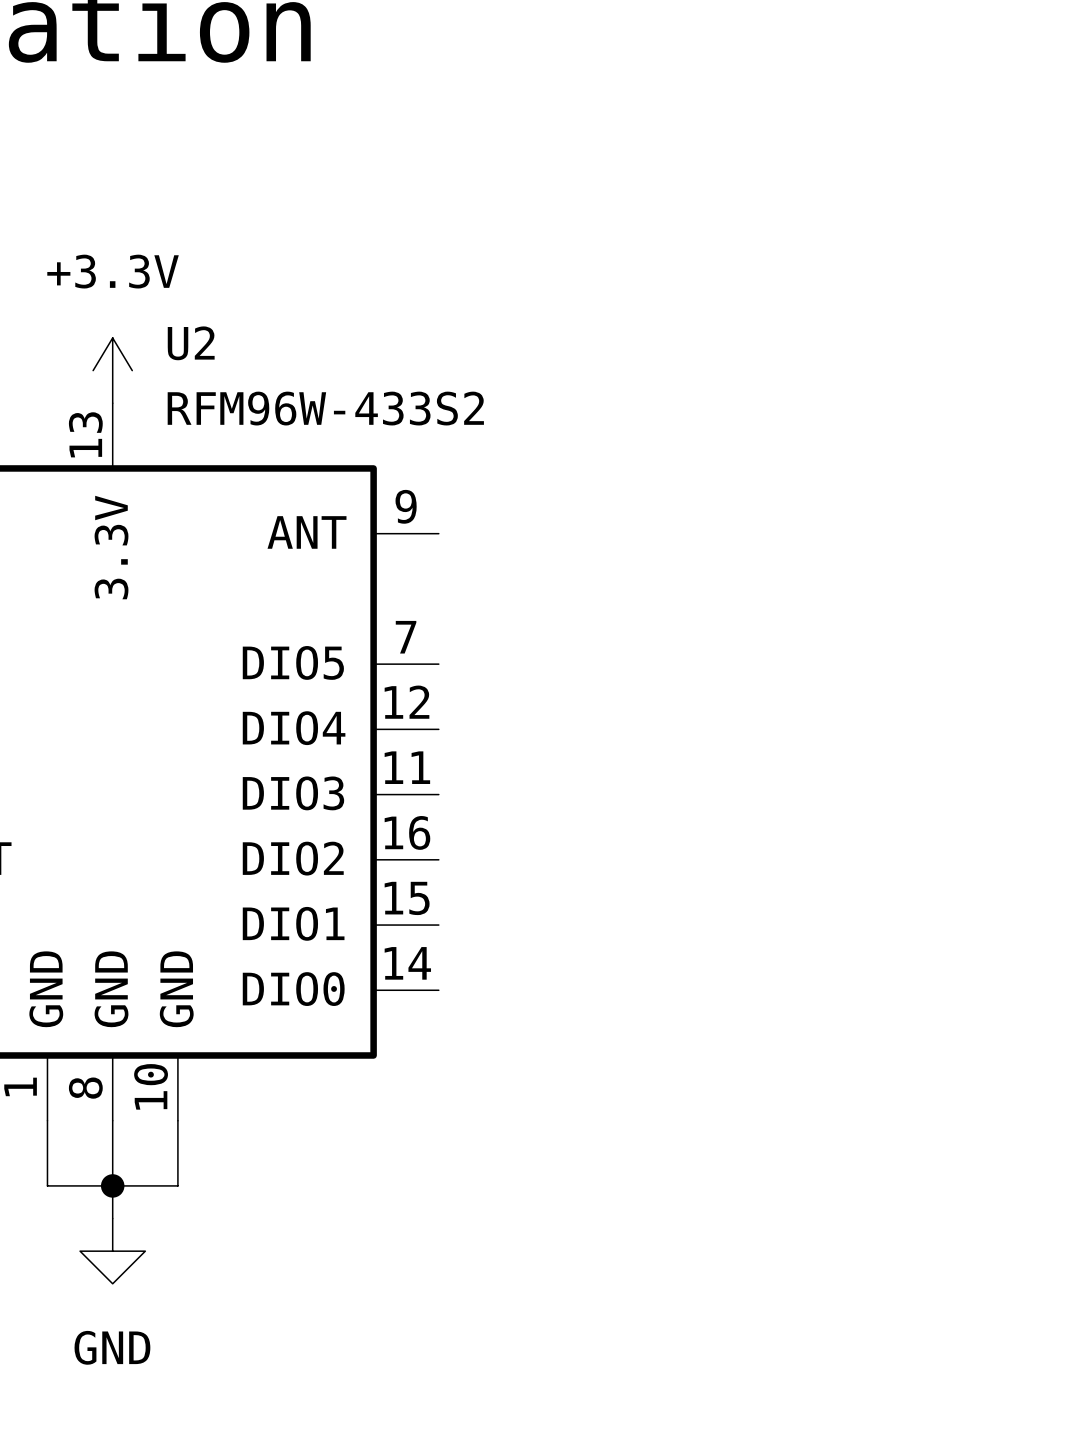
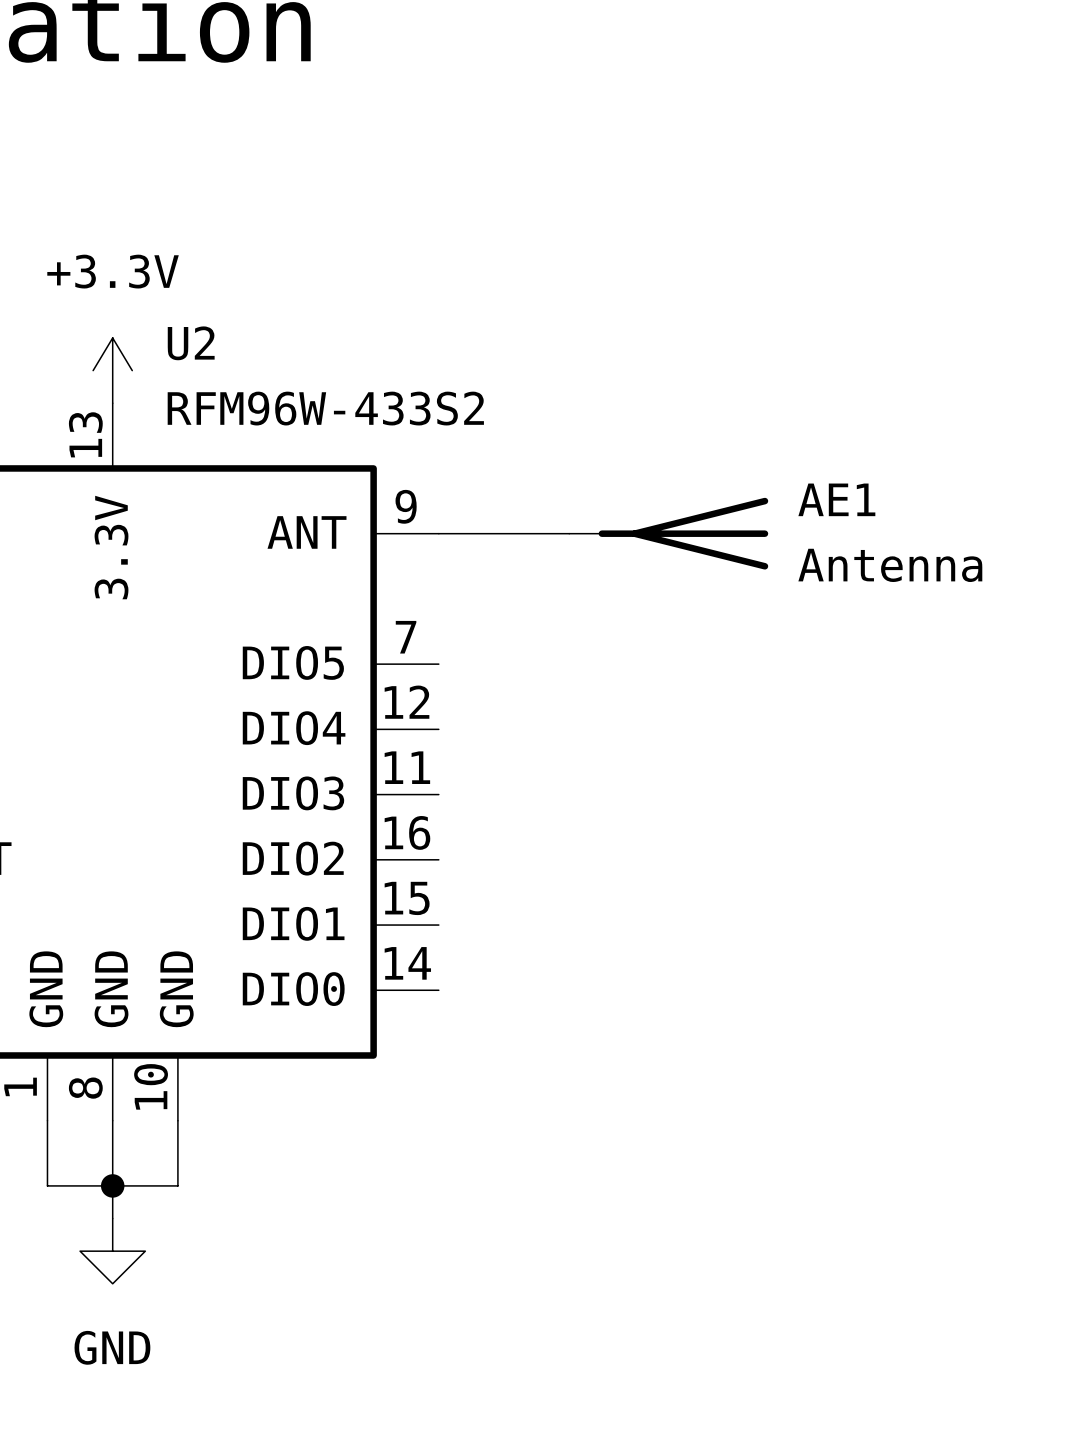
wire: none -> (438, 533) (569, 533)
AE1: none -> Antenna (668, 533)

